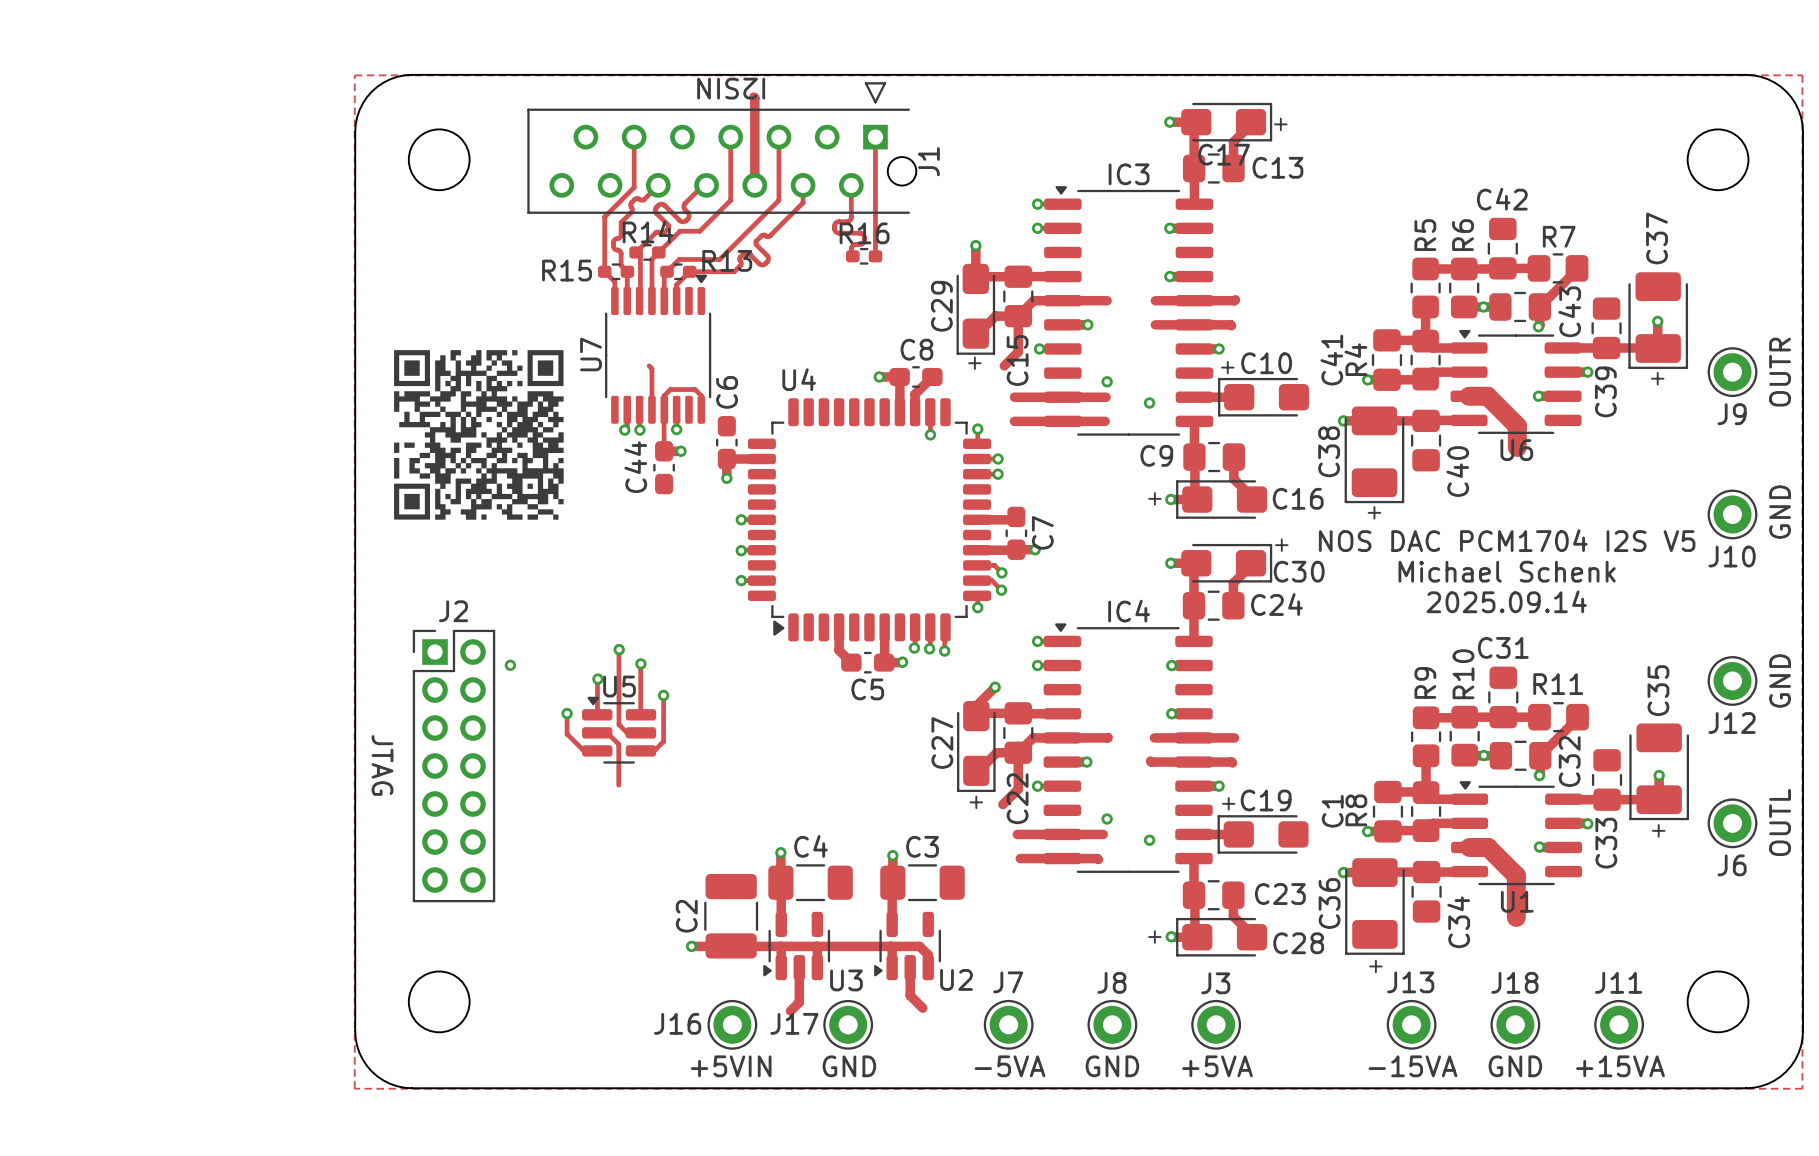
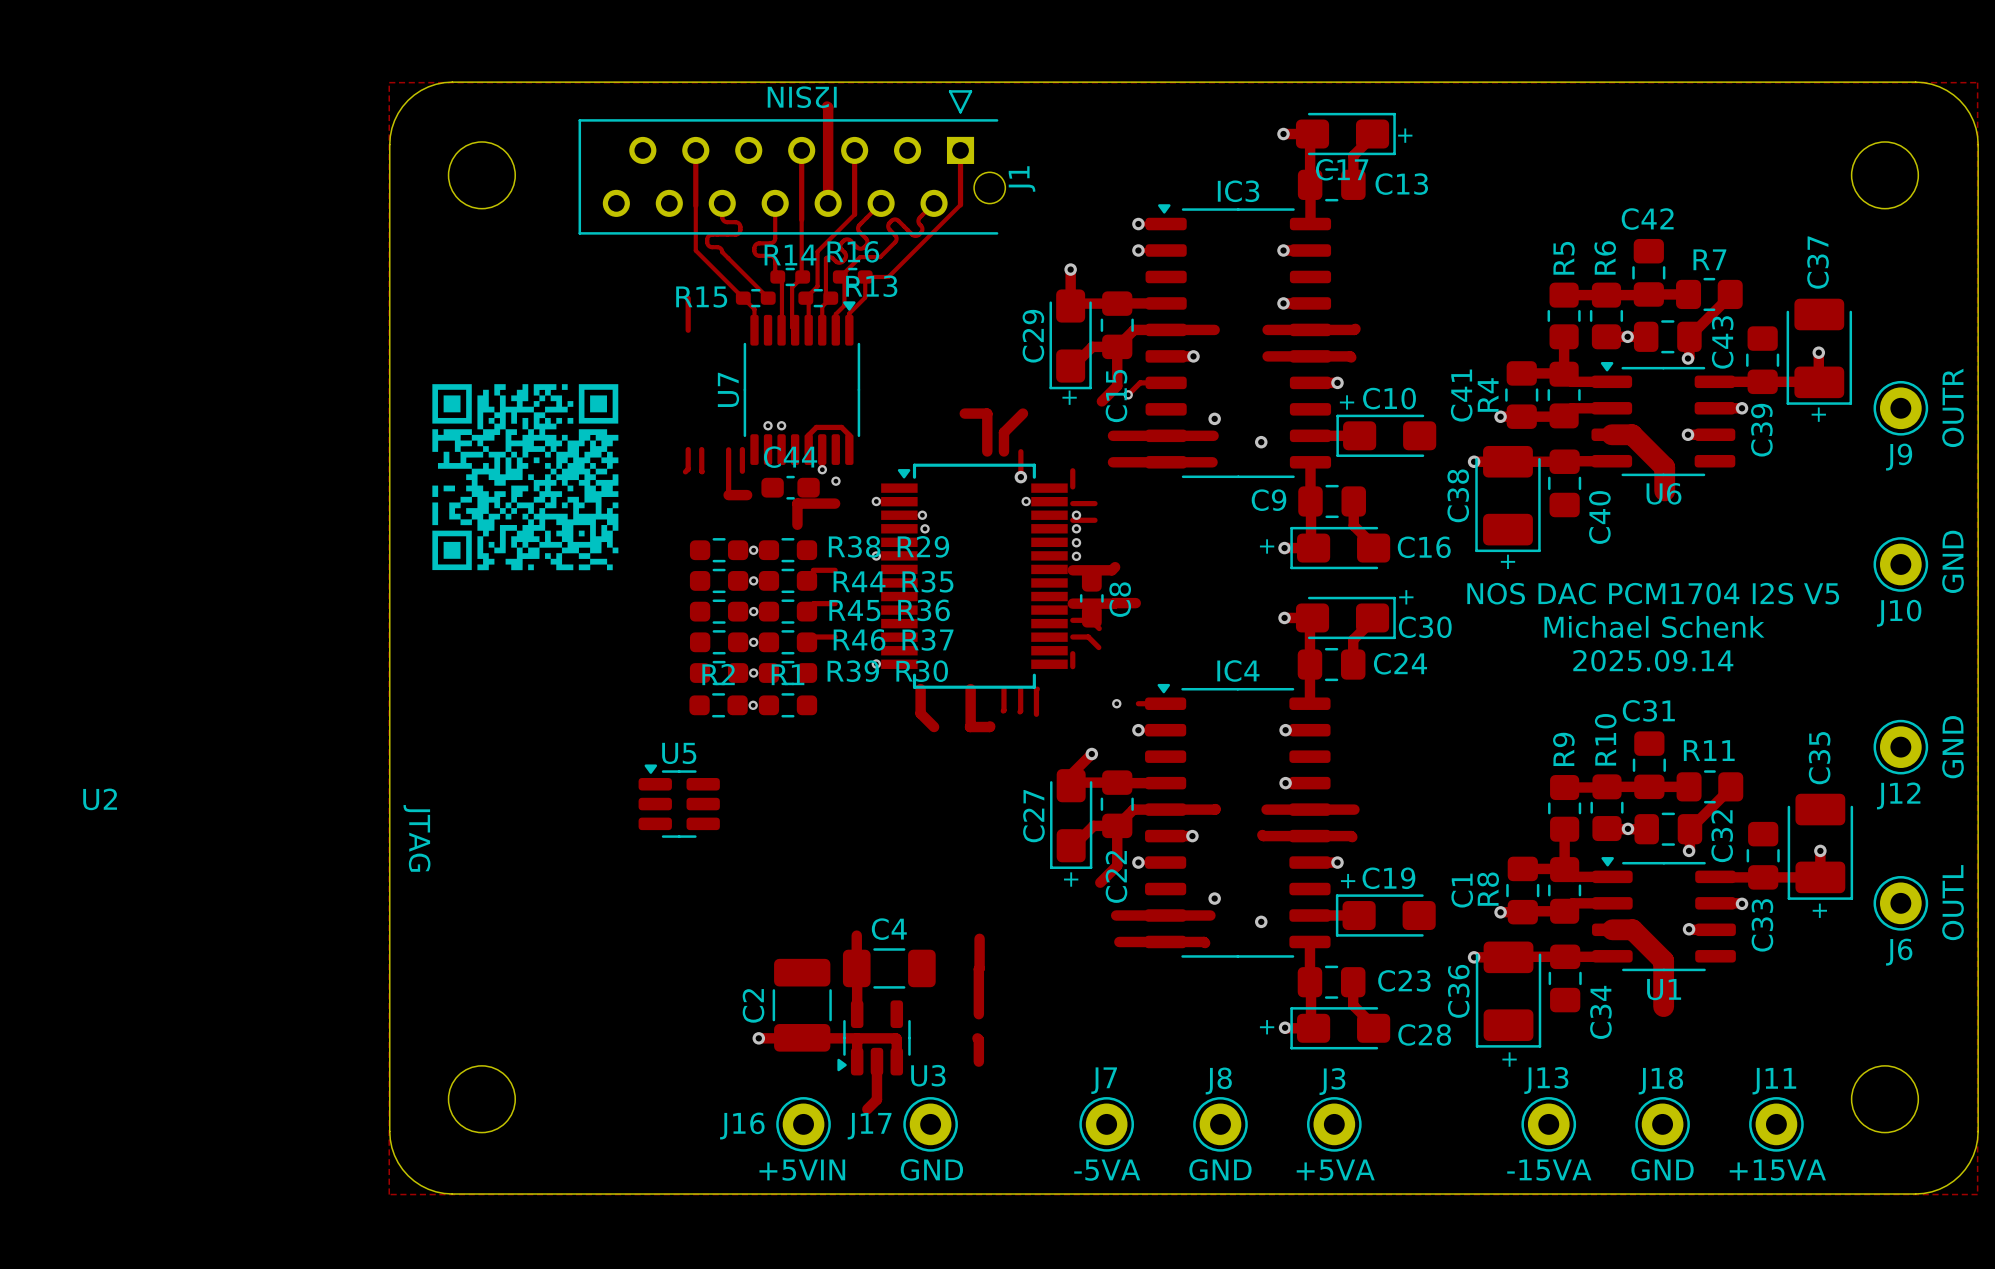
track: (658, 185) (643, 199) (636, 198) (631, 203) (632, 211) (621, 222) (620, 236) (613, 241) (614, 248) (621, 252) (621, 265) (627, 271) -> (722, 203) (723, 219) (726, 222) (738, 222) (740, 231) (736, 234) (710, 234) (707, 238) (707, 244) (710, 246) (720, 248) (768, 298)
track: (706, 185) (703, 185) (684, 204) (684, 208) (689, 215) (684, 221) (680, 220) (663, 204) (659, 204) (655, 207) (655, 212) (668, 227) (663, 233) (655, 232) (636, 252) (640, 256) (639, 301) -> (775, 203) (774, 240) (771, 243) (757, 243) (754, 250) (757, 255) (771, 255) (774, 259) (775, 271) (781, 281) (781, 330)
track: (803, 185) (803, 202) (769, 236) (762, 235) (755, 241) (756, 244) (768, 257) (765, 263) (760, 264) (746, 252) (740, 257) (741, 264) (734, 271) (689, 271) (676, 284) (676, 301) -> (881, 203) (858, 226) (858, 231) (867, 240) (864, 247) (858, 248) (850, 240) (845, 239) (840, 245) (846, 255) (842, 261) (838, 262) (830, 257) (825, 258) (825, 293) (830, 298) (822, 306) (822, 330)
track: (851, 185) (851, 218) (847, 221) (836, 222) (834, 228) (838, 233) (860, 233) (863, 235) (863, 243) (851, 247) (852, 256) -> (934, 203) (918, 218) (922, 229) (918, 234) (913, 235) (898, 220) (892, 220) (888, 226) (896, 236) (895, 242) (880, 257) (860, 257) (840, 276) (844, 281) (844, 305) (835, 314) (835, 330)
track: (875, 186) (875, 256) -> (960, 204) (888, 276) (865, 276) (865, 297) (849, 313) (849, 330)
track: (634, 187) (604, 216) (604, 271) (614, 281) (614, 301) -> (695, 205) (695, 250) (754, 309) (754, 330)
track: (778, 195) (778, 200) (719, 259) (679, 259) (664, 274) (664, 301) -> (854, 214) (817, 251) (817, 286) (805, 298) (808, 301) (808, 330)
track: (730, 200) (699, 231) (680, 231) (651, 259) (651, 301) -> (801, 219) (802, 276) (792, 287) (792, 327) (795, 330)
R14 position: (647, 252) -> (790, 276)
R16 position: (864, 256) -> (852, 276)
R15 position: (616, 271) -> (755, 298)
R13 position: (678, 271) -> (818, 298)
track: none -> (1140, 382) (1128, 394)
via: (1039, 348) -> none
U7 position: (658, 349) -> (801, 383)
via: none -> (1128, 394)
track: (649, 365) (651, 368) (651, 409) -> none
via: (879, 376) -> none
C8 rotation: 0° (915, 376) -> 90° clockwise (1091, 598)
C8 position: (915, 376) -> (1091, 598)
via: none -> (768, 425)
via: none -> (781, 425)
track: (664, 409) (664, 395) (670, 389) (695, 389) (701, 395) (701, 409) -> none
track: none -> (808, 449) (808, 435) (816, 427) (841, 427) (849, 435) (849, 449)
via: none -> (822, 469)
via: (676, 429) -> none
via: (977, 429) -> none
via: (624, 430) -> none
via: (639, 430) -> none
via: none -> (835, 481)
C6: (726, 442) -> none
via: (680, 451) -> none
via: none -> (876, 501)
via: none -> (1026, 501)
via: (998, 458) -> none
C44 rotation: 0° (664, 467) -> 90° clockwise (790, 487)
C44 position: (664, 467) -> (790, 487)
via: none -> (922, 515)
via: none -> (1076, 515)
via: (998, 474) -> none
via: (726, 478) -> none
via: none -> (1076, 528)
via: none -> (924, 528)
via: none -> (1076, 542)
R38: none -> (719, 550)
via: none -> (753, 550)
R29: none -> (787, 550)
via: none -> (876, 556)
via: none -> (1076, 556)
via: (741, 519) -> none
U4: (869, 519) -> none
R44: none -> (719, 580)
via: none -> (753, 580)
R35: none -> (787, 580)
C7: (1016, 533) -> none
via: (1035, 549) -> none
via: (741, 550) -> none
R45: none -> (719, 611)
via: none -> (753, 611)
R36: none -> (787, 611)
via: (1001, 572) -> none
via: (741, 580) -> none
R46: none -> (719, 642)
via: none -> (753, 642)
R37: none -> (787, 642)
via: (1001, 590) -> none
via: none -> (876, 664)
via: (977, 607) -> none
R39: none -> (719, 673)
via: none -> (753, 673)
R30: none -> (787, 673)
via: none -> (1116, 703)
via: (1037, 641) -> none
R2: none -> (718, 705)
via: none -> (753, 705)
R1: none -> (787, 705)
via: (914, 648) -> none
via: (929, 648) -> none
track: (618, 649) (618, 724) (627, 732) (640, 732) -> none
via: (619, 649) -> none
via: (944, 651) -> none
C5: (867, 662) -> none
via: (902, 662) -> none
via: (640, 663) -> none
track: (640, 664) (640, 714) -> none
via: (510, 665) -> none
track: (597, 679) (597, 714) -> none
via: (597, 679) -> none
track: (663, 695) (663, 741) (654, 750) (640, 750) -> none
via: (663, 695) -> none
track: (567, 713) (567, 734) (583, 750) (597, 750) -> none
via: (567, 713) -> none
track: (597, 732) (607, 732) (618, 744) (618, 785) -> none
J2: (453, 766) -> none
via: (780, 852) -> none
via: (892, 855) -> none
C3: (922, 882) -> none
U2 footprint: [874, 911, 941, 981] -> [881, 463, 1068, 689]
track: (816, 946) (919, 946) (928, 955) (928, 967) -> none
track: (910, 967) (910, 995) (922, 1008) -> none
U2 name position: U2 (956, 979) -> U2 (100, 799)

